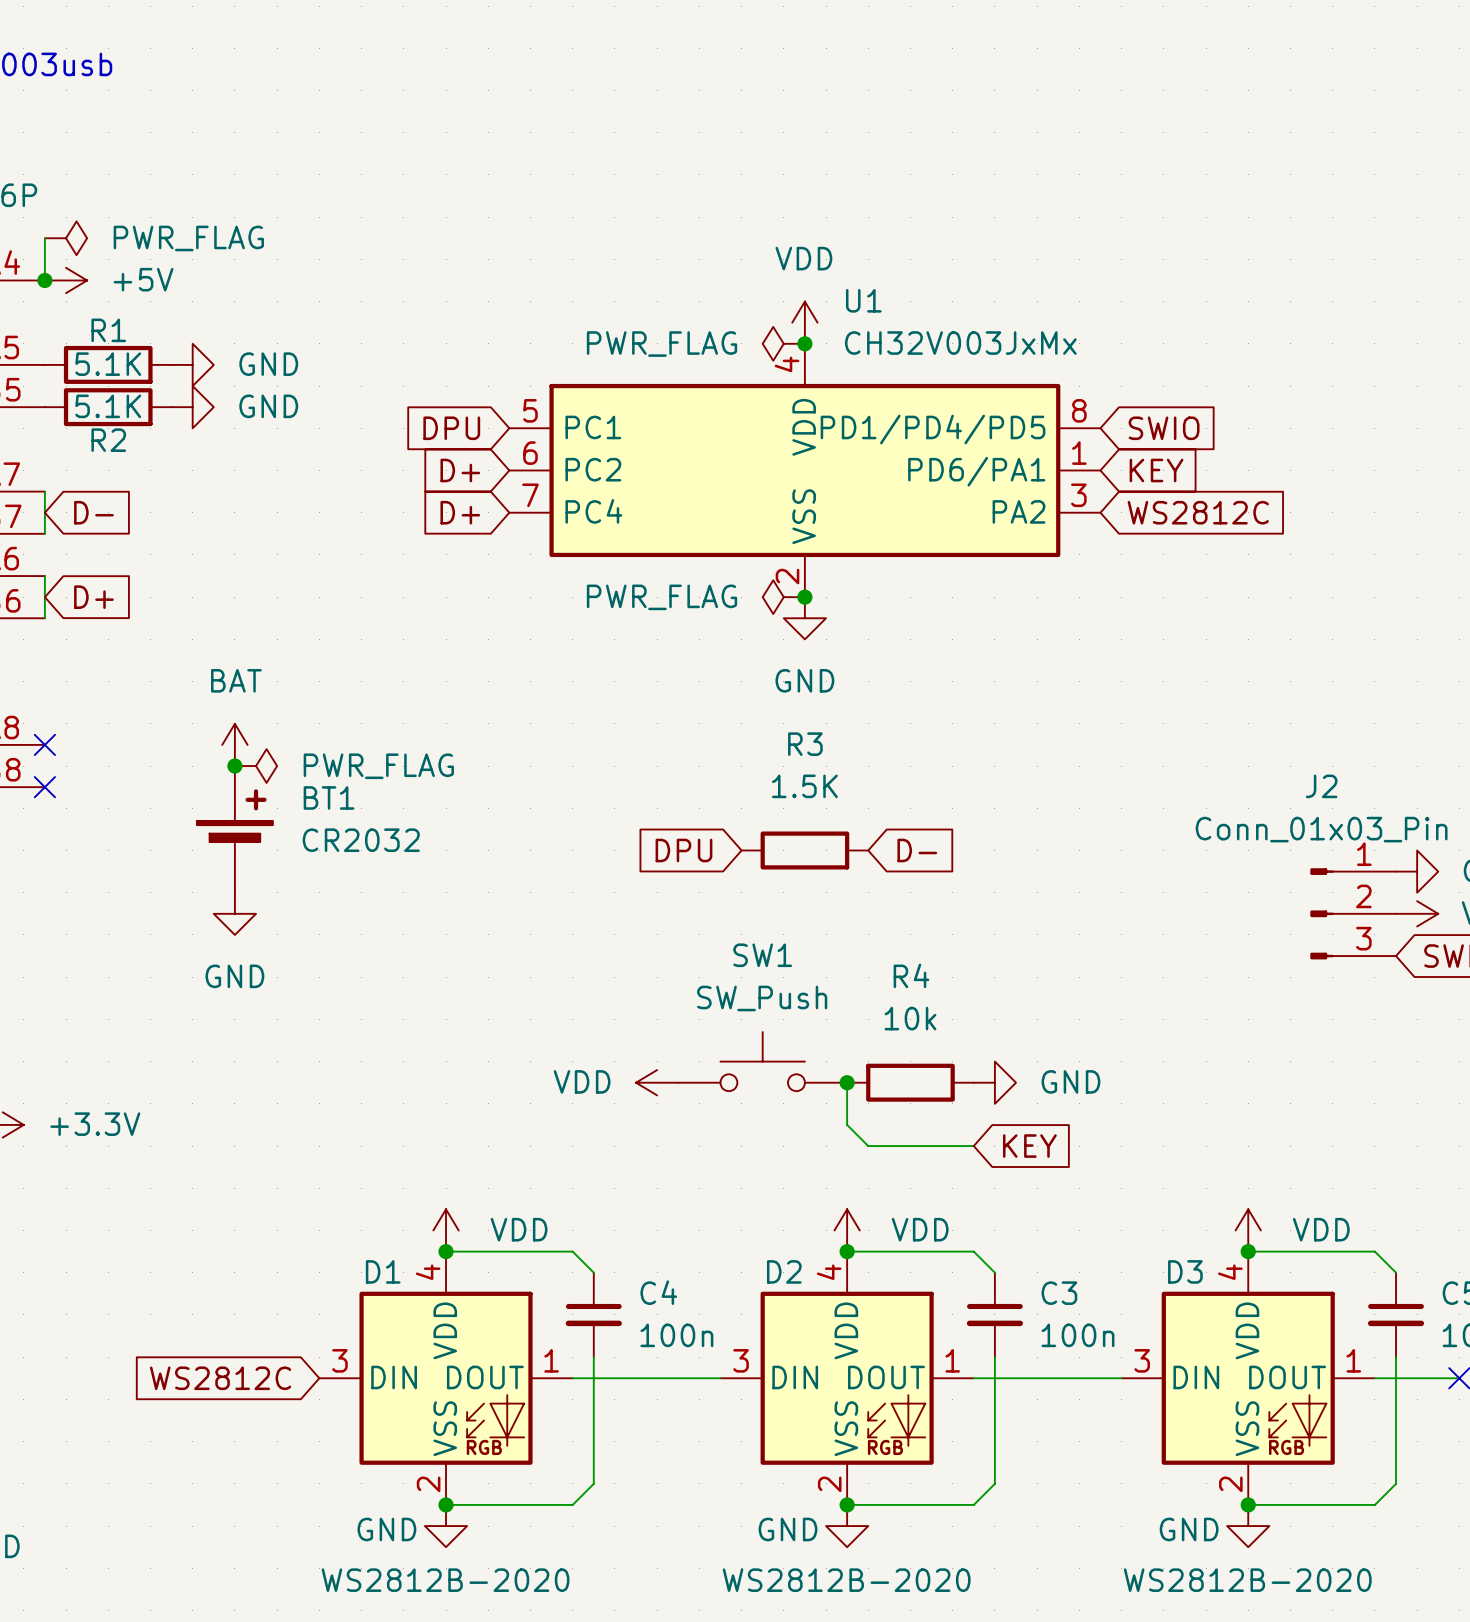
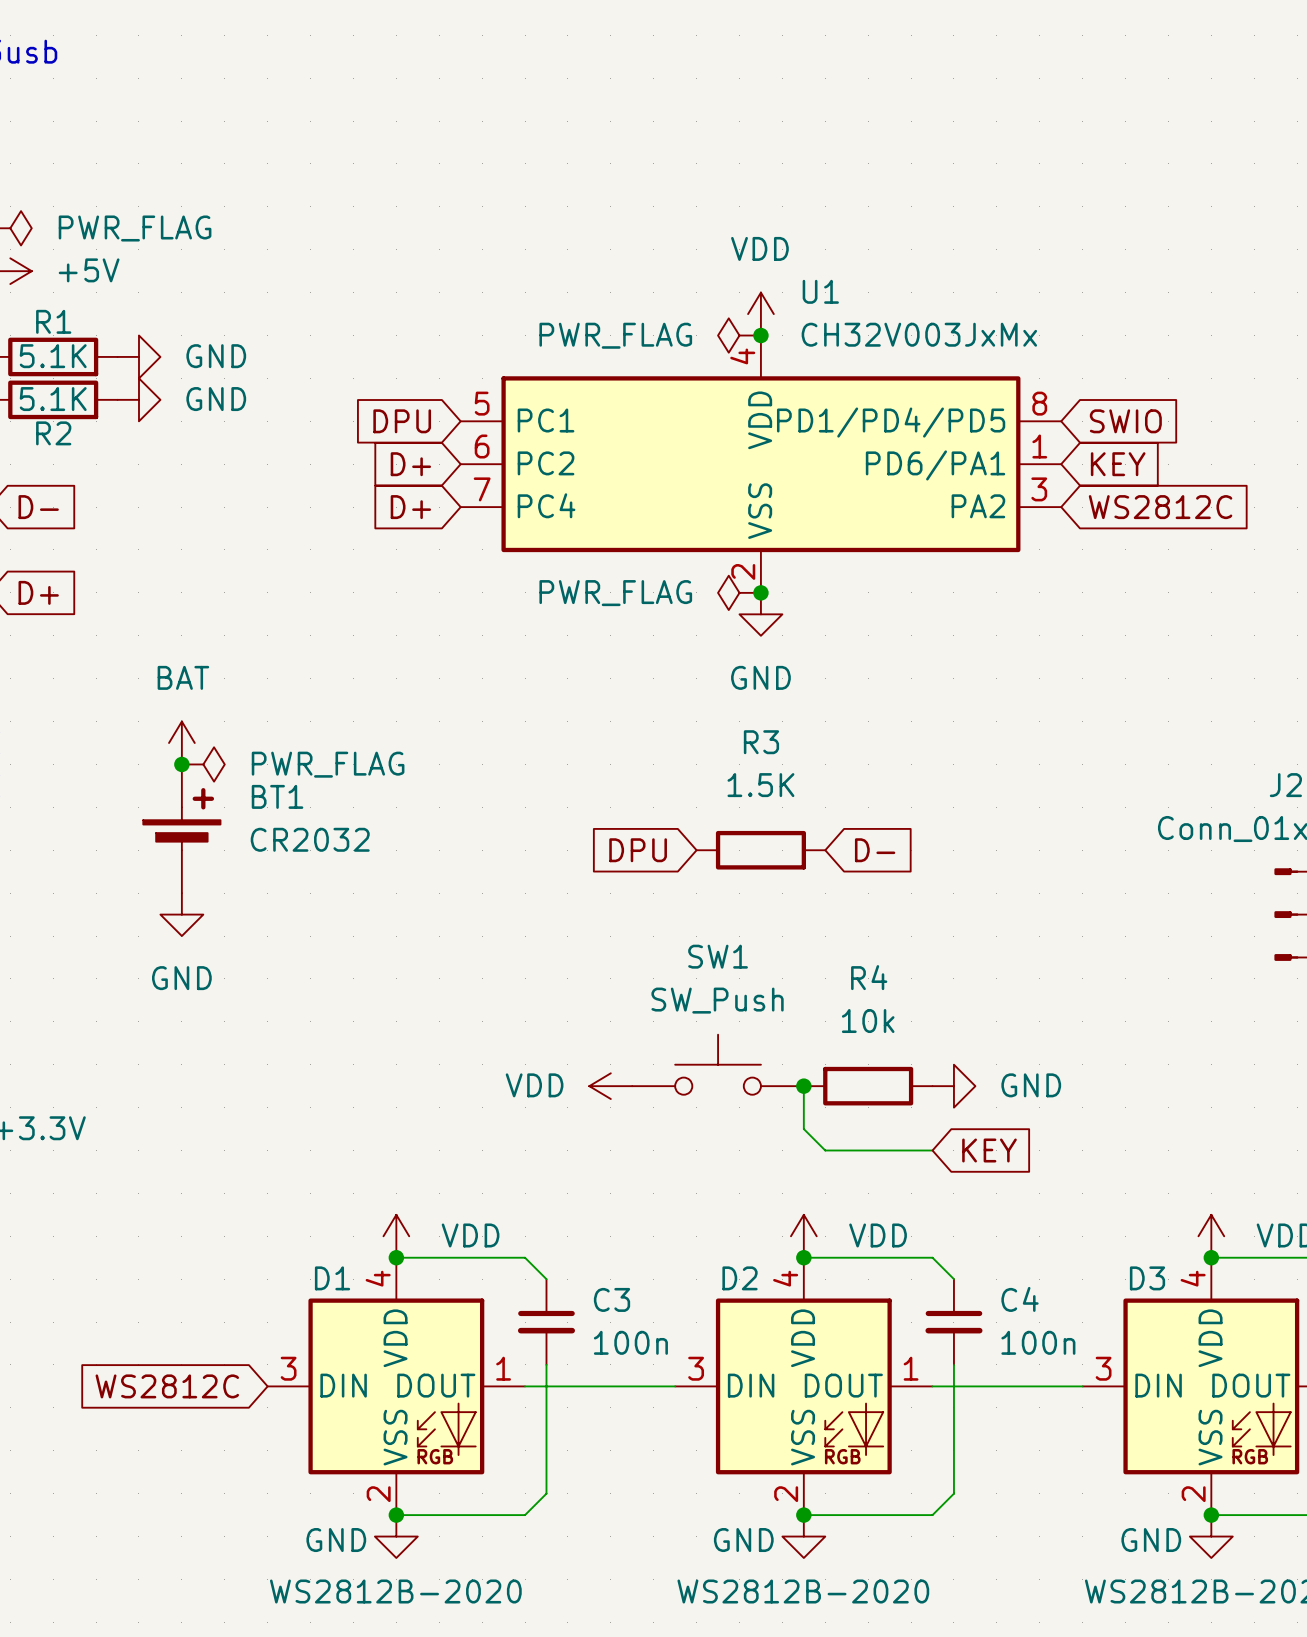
C4 name: C4 (658, 1292) -> C3 (612, 1299)
C3 name: C3 (1059, 1293) -> C4 (1020, 1299)

